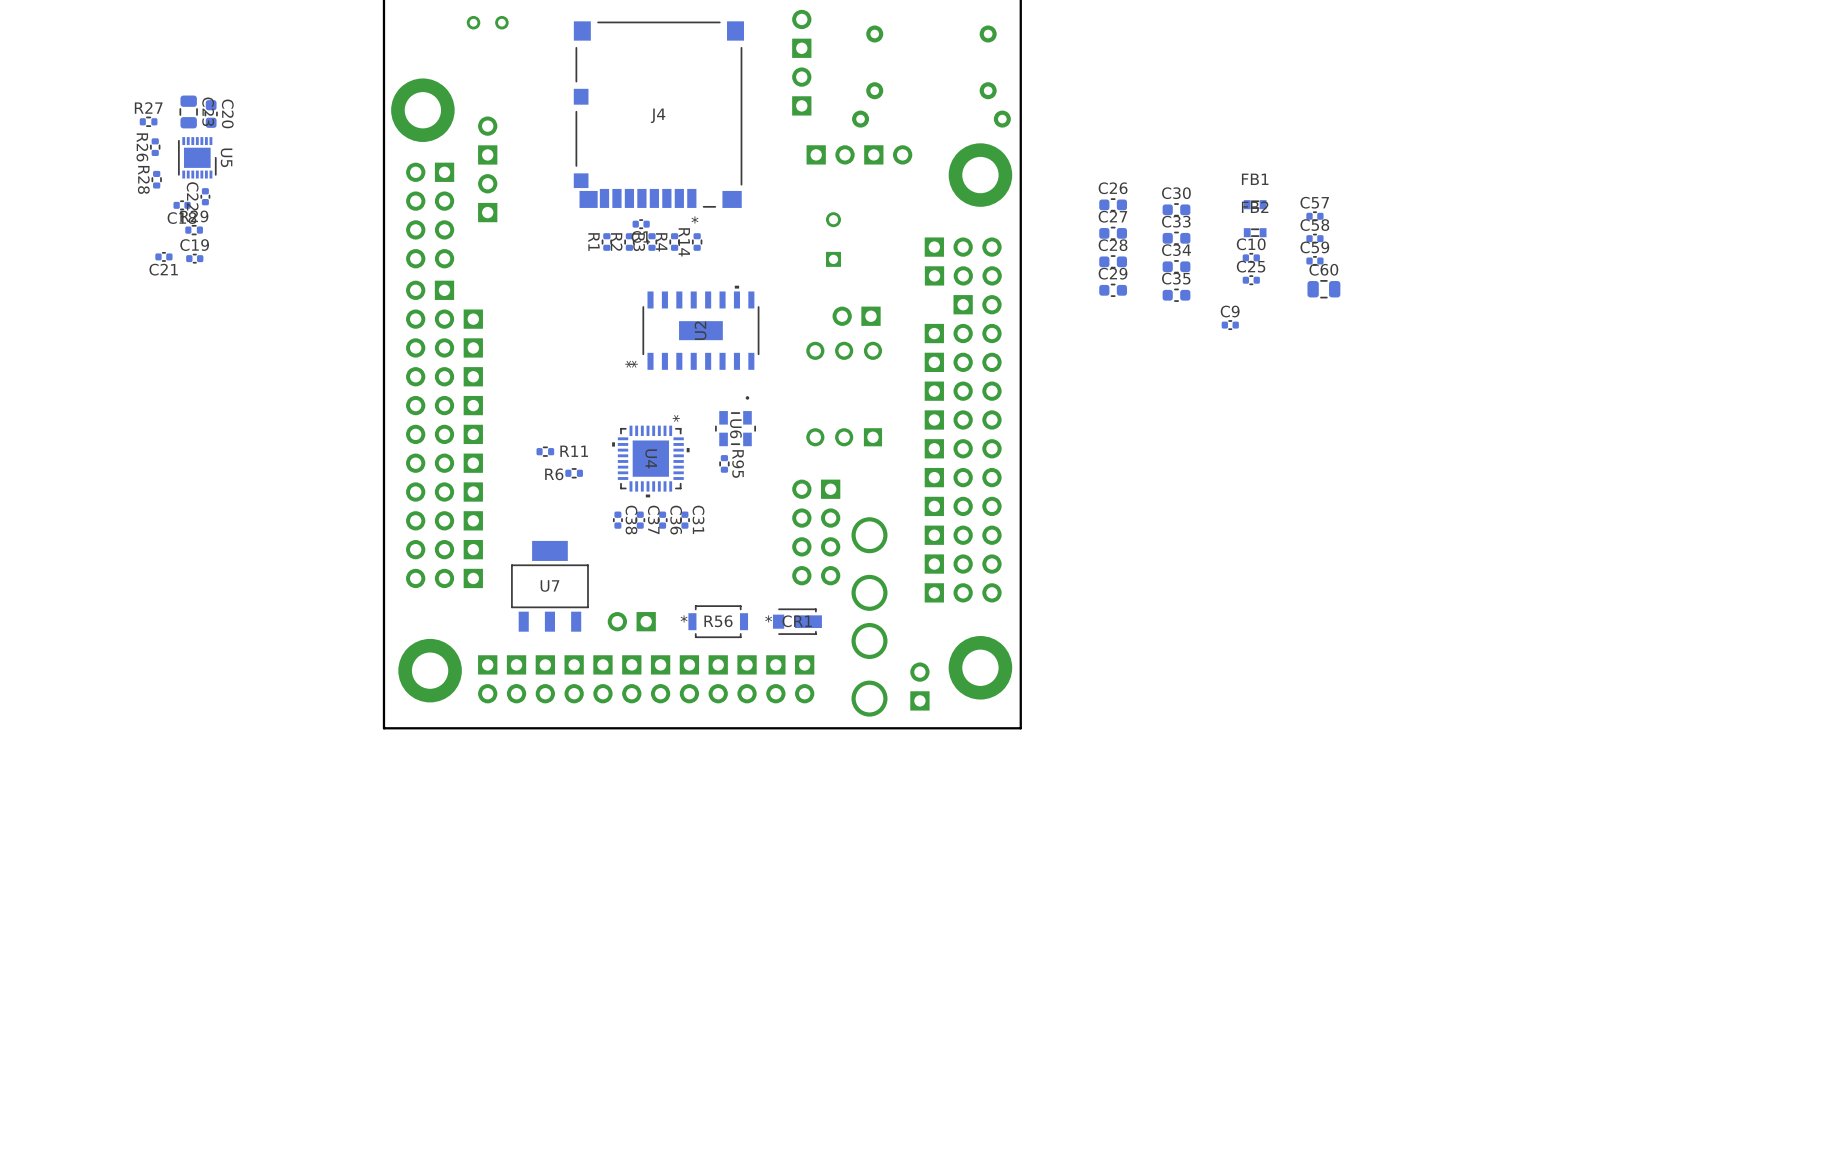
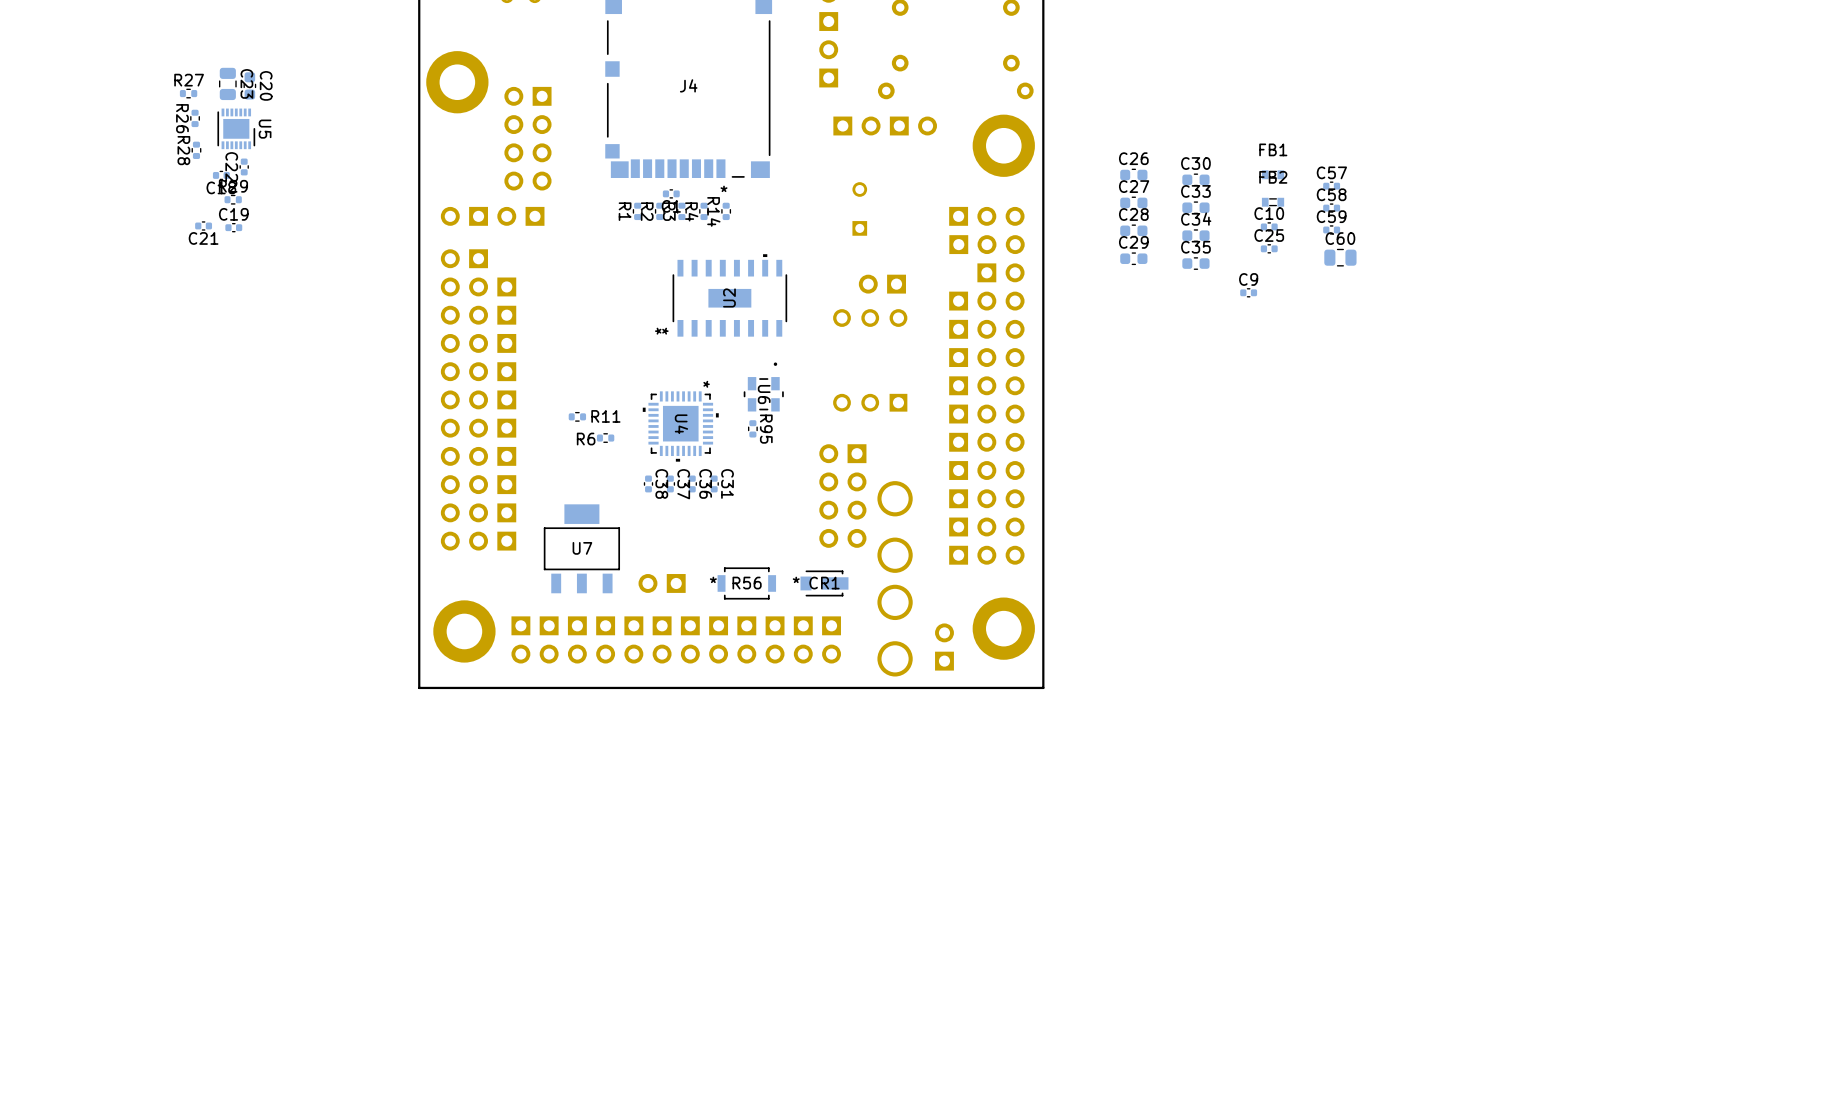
part: (487, 140) -> none
part: (487, 198) -> none
part position: (430, 215) -> (527, 138)
part: none -> (464, 216)
part: none -> (520, 216)

